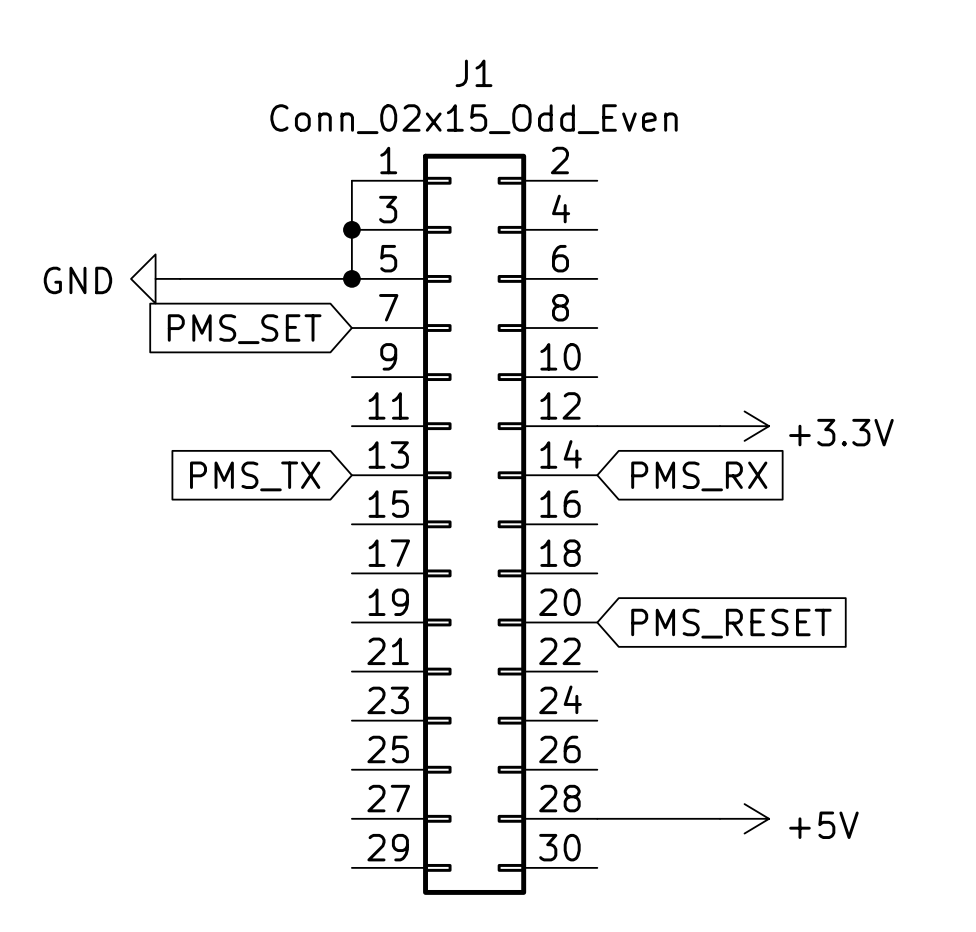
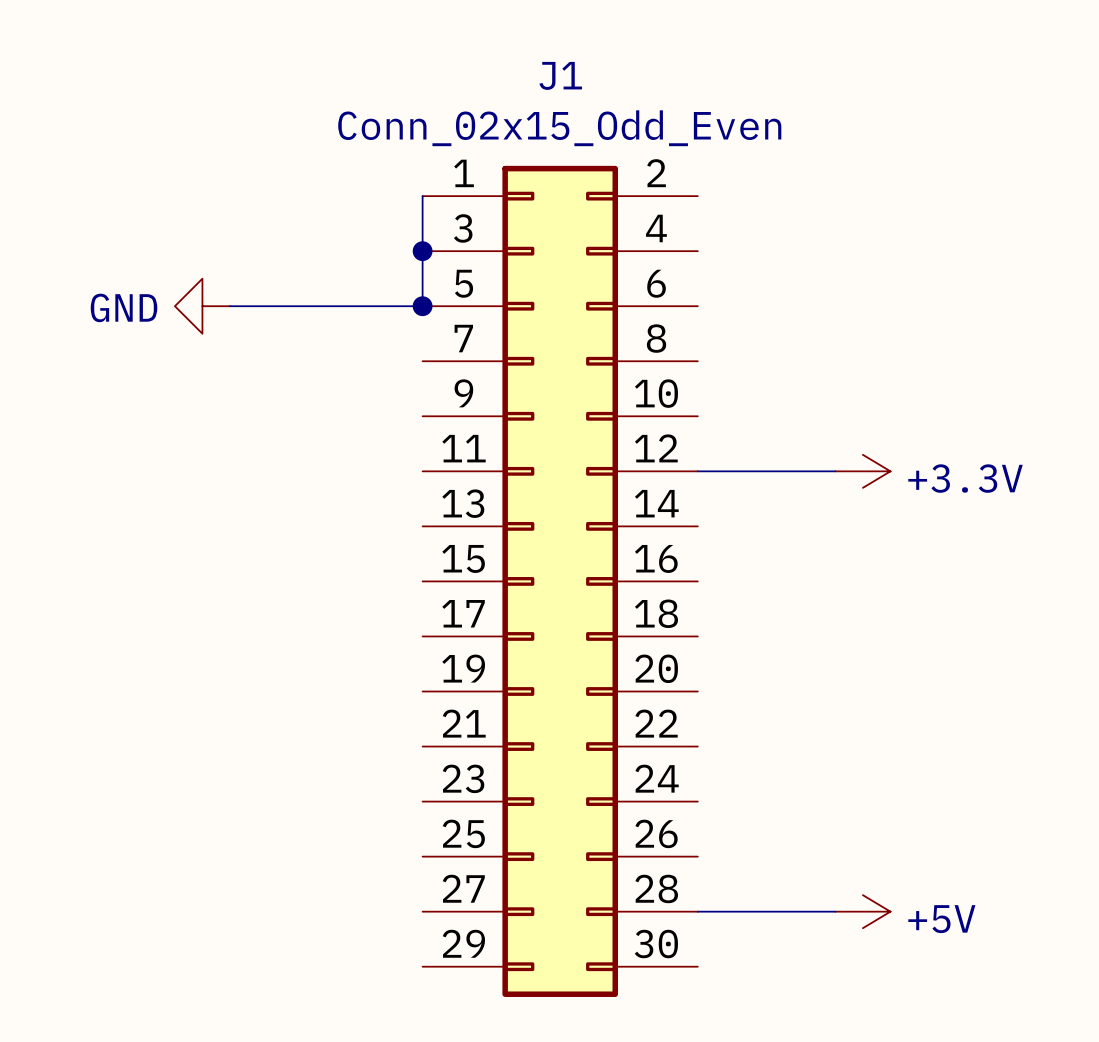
global label: PMS_SET (244, 329) -> none
global label: PMS_TX (255, 476) -> none
global label: PMS_RX (699, 476) -> none
global label: PMS_RESET (731, 623) -> none

